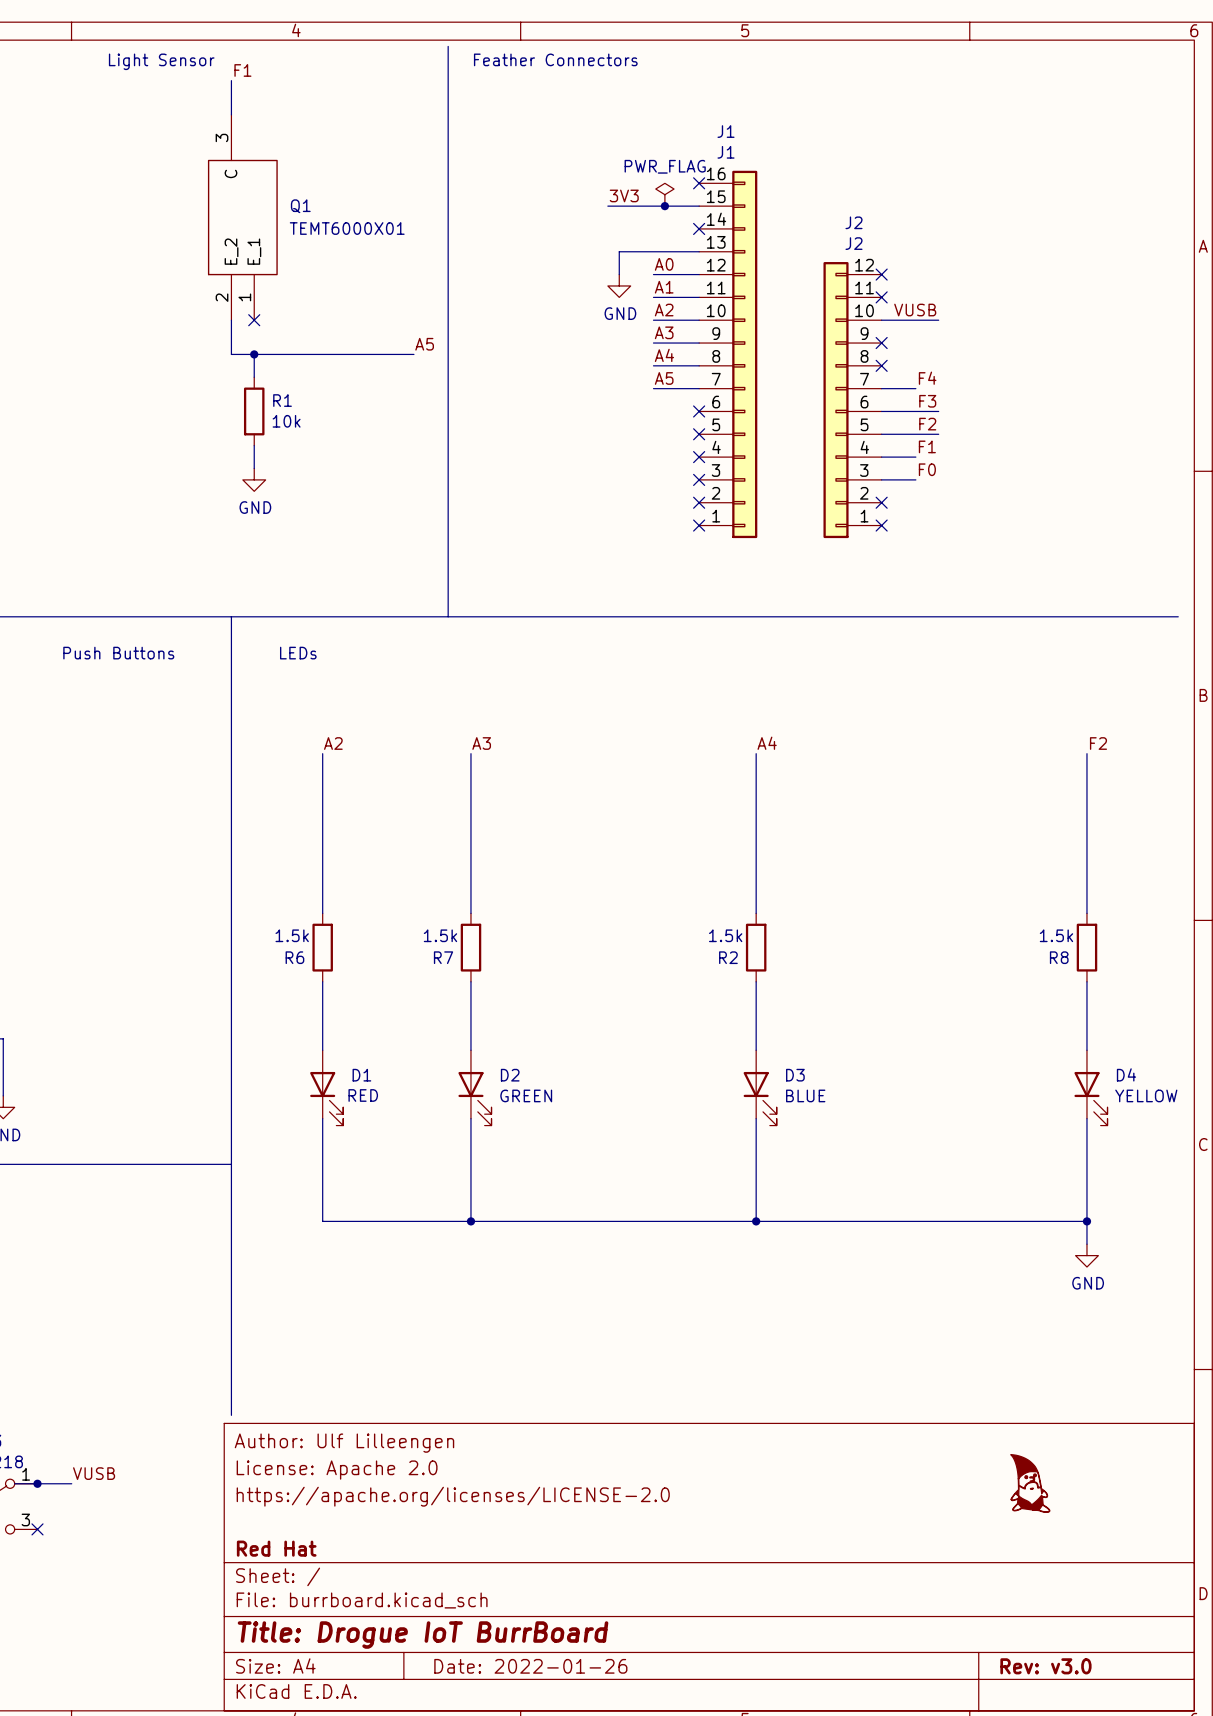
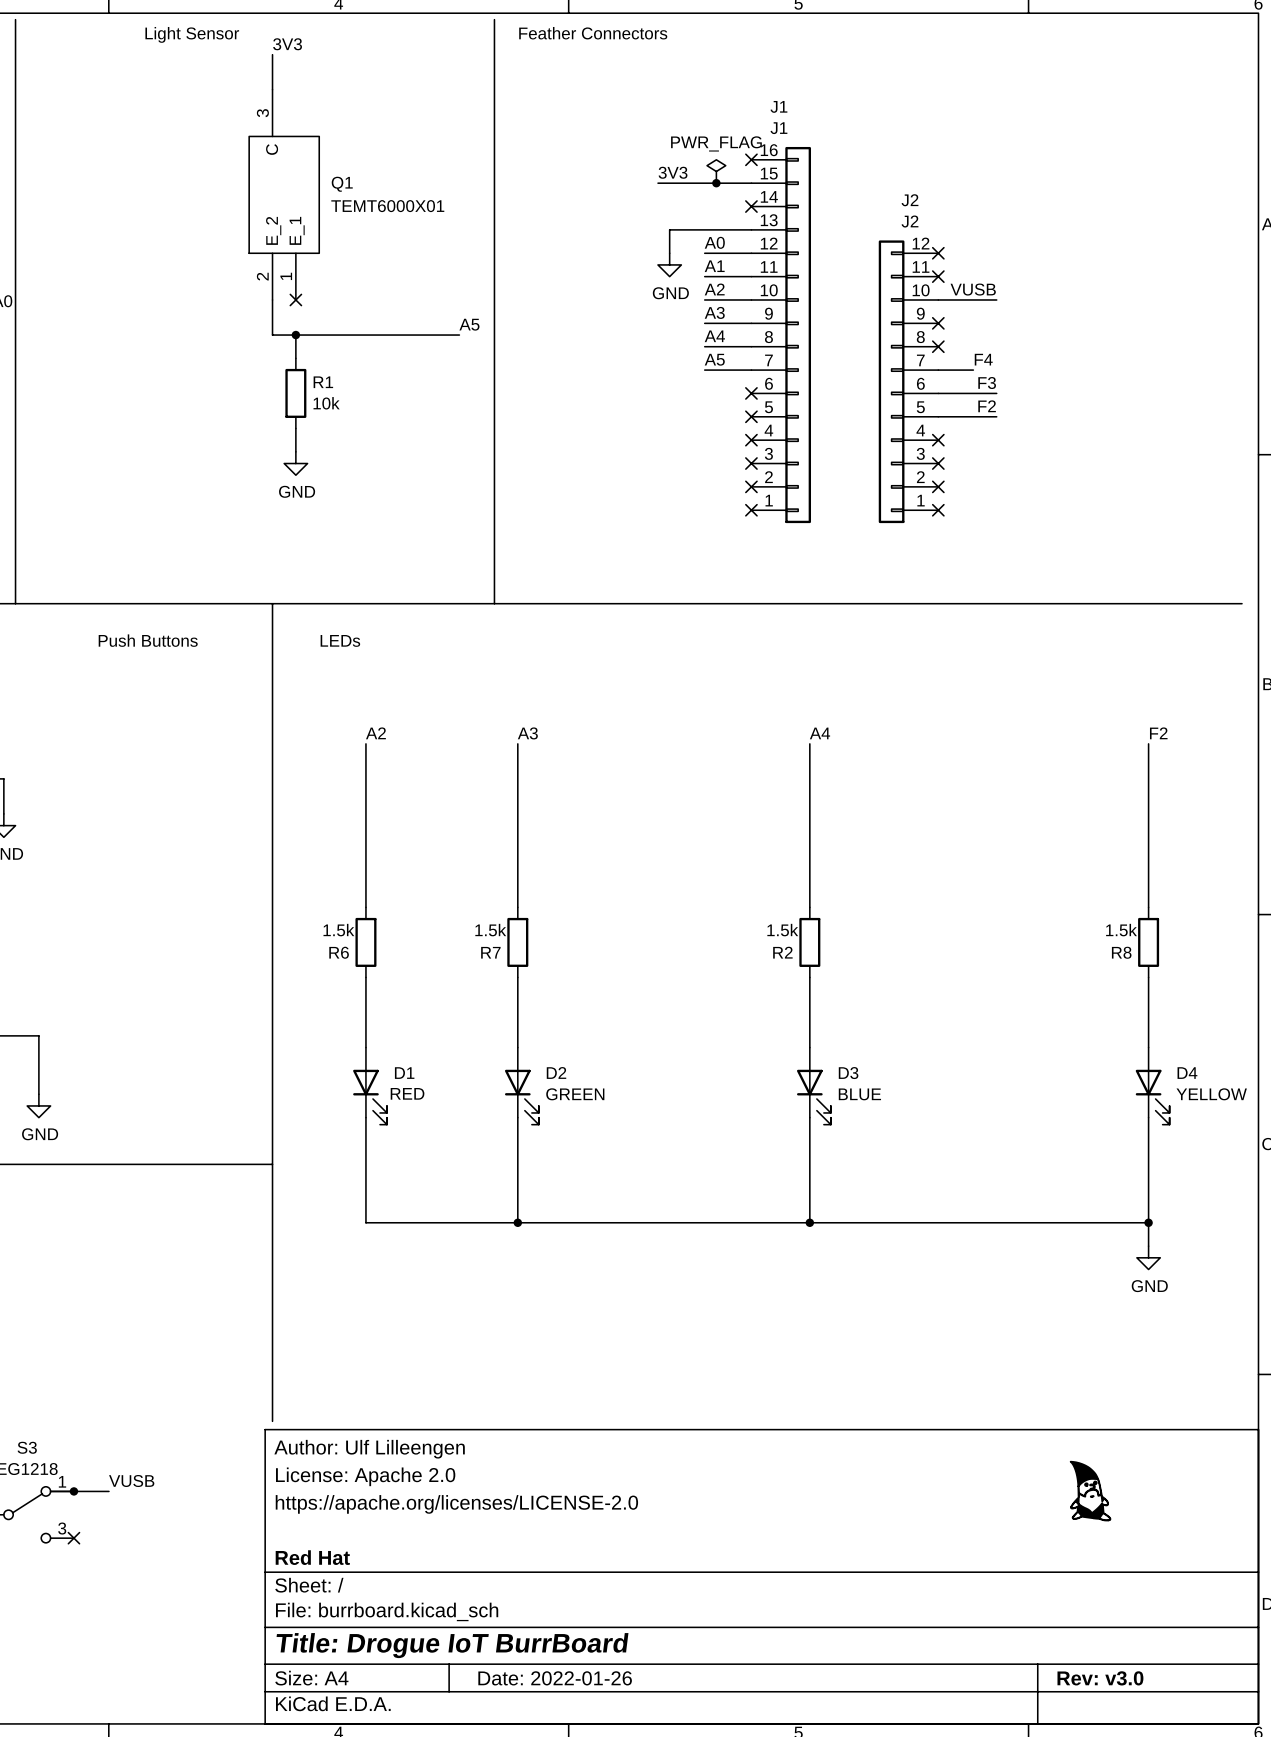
label: F1 (242, 70) -> 3V3 (287, 44)
label: F1 (927, 446) -> none
wire: (881, 457) (915, 457) -> none
no-connect mark: none -> (938, 440)
label: F0 (927, 469) -> none
wire: (881, 479) (915, 479) -> none
no-connect mark: none -> (938, 463)

